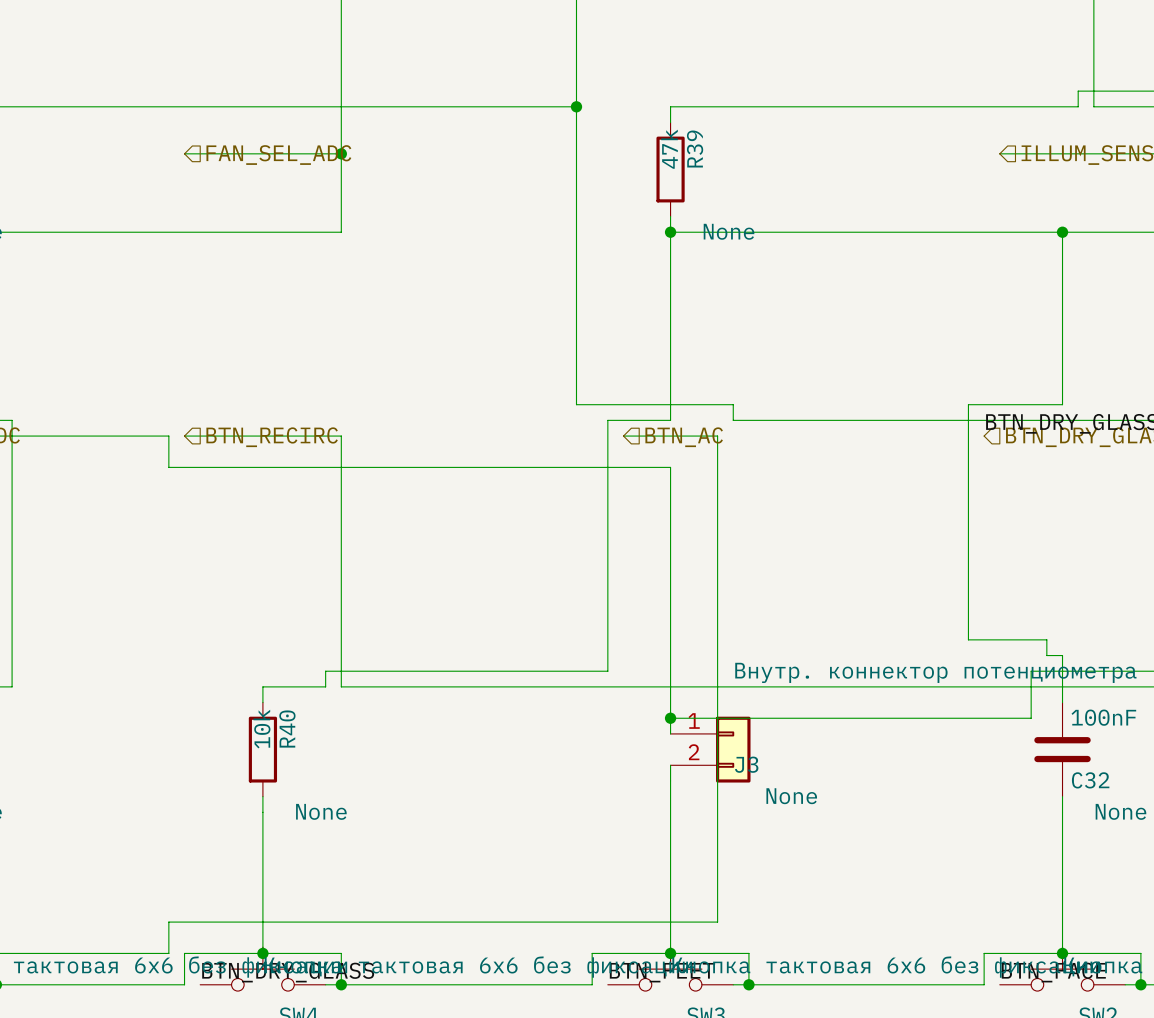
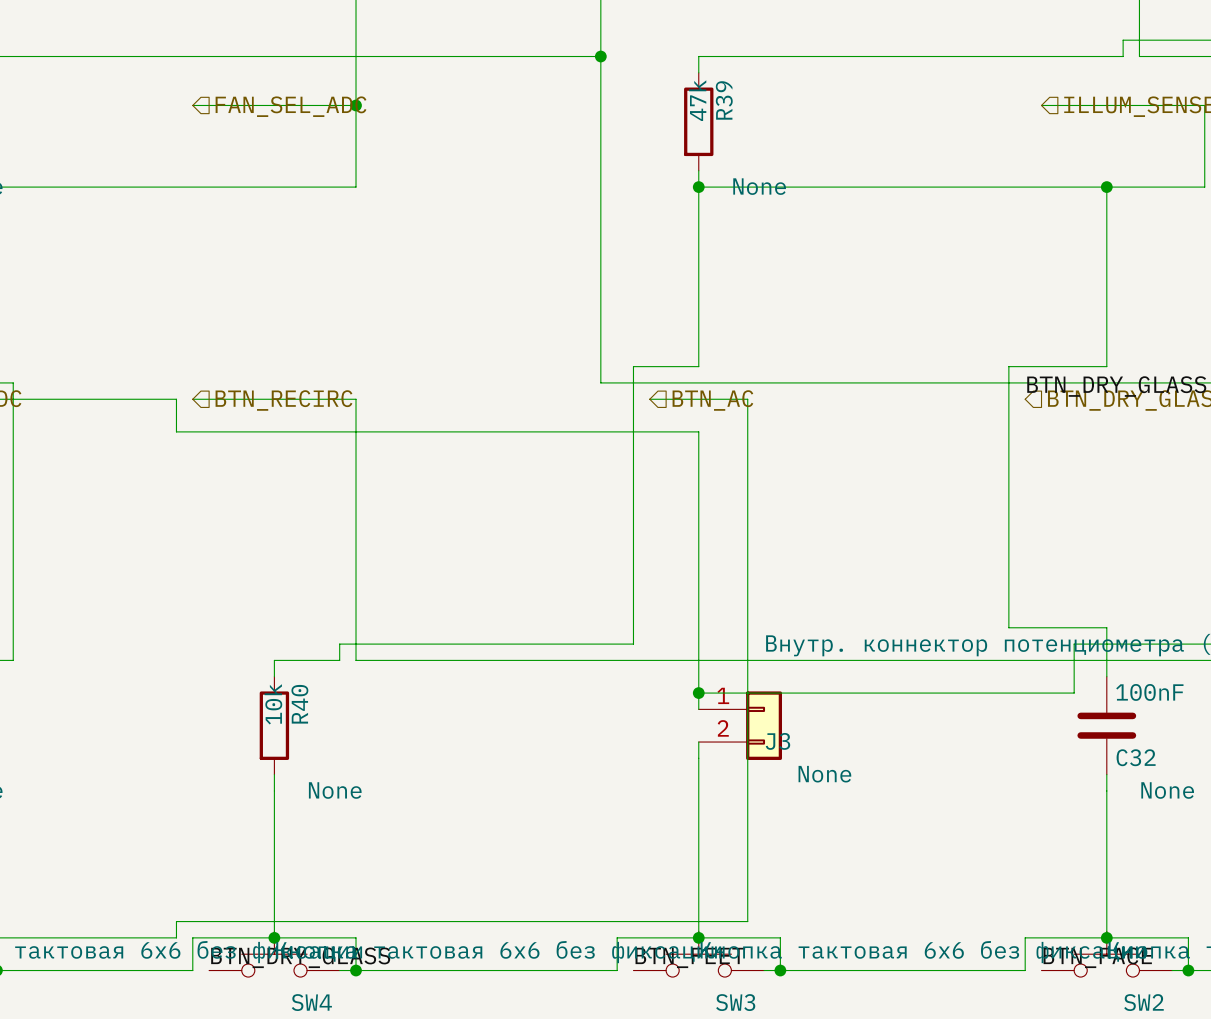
wire: (576, 404) (607, 404) -> (600, 366) (600, 382) (633, 382) (633, 366)
wire: (670, 420) (670, 404) (733, 404) (733, 420) -> (698, 382) (764, 382)
wire: (968, 639) (1046, 639) (1046, 655) -> (1008, 611) (1008, 627) (1090, 627)
wire: (717, 922) (168, 922) (168, 937) -> (747, 905) (747, 921) (176, 921)

